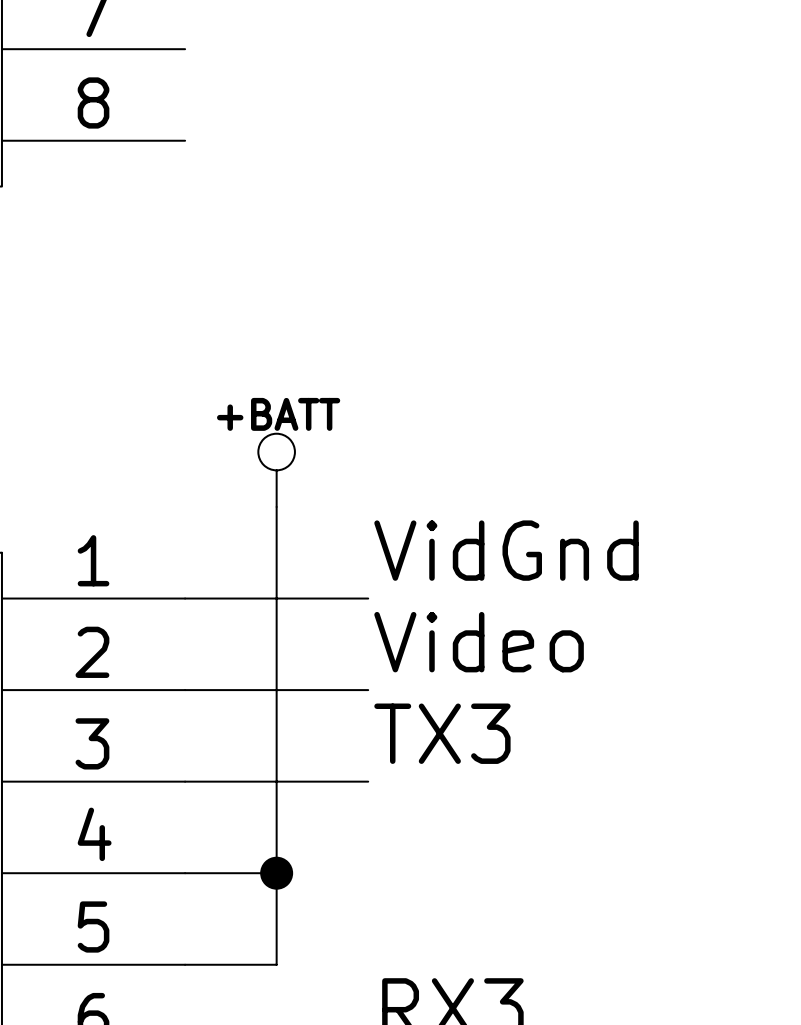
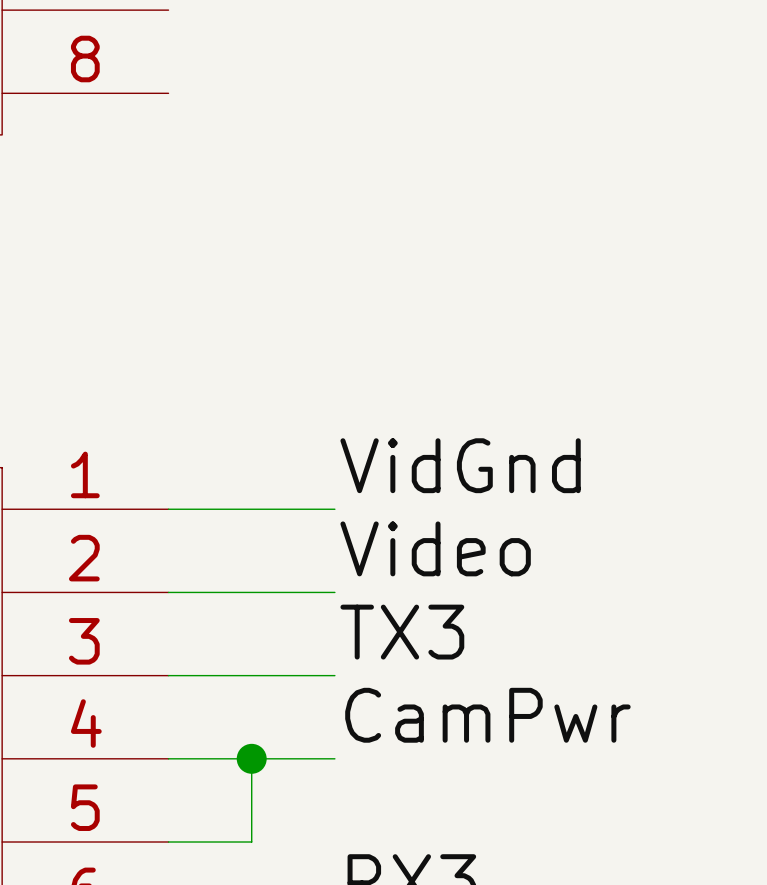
power symbol: +BATT (276, 470) -> none
wire: (276, 506) (276, 873) -> (334, 758) (251, 758)
label: none -> CamPwr (487, 715)

